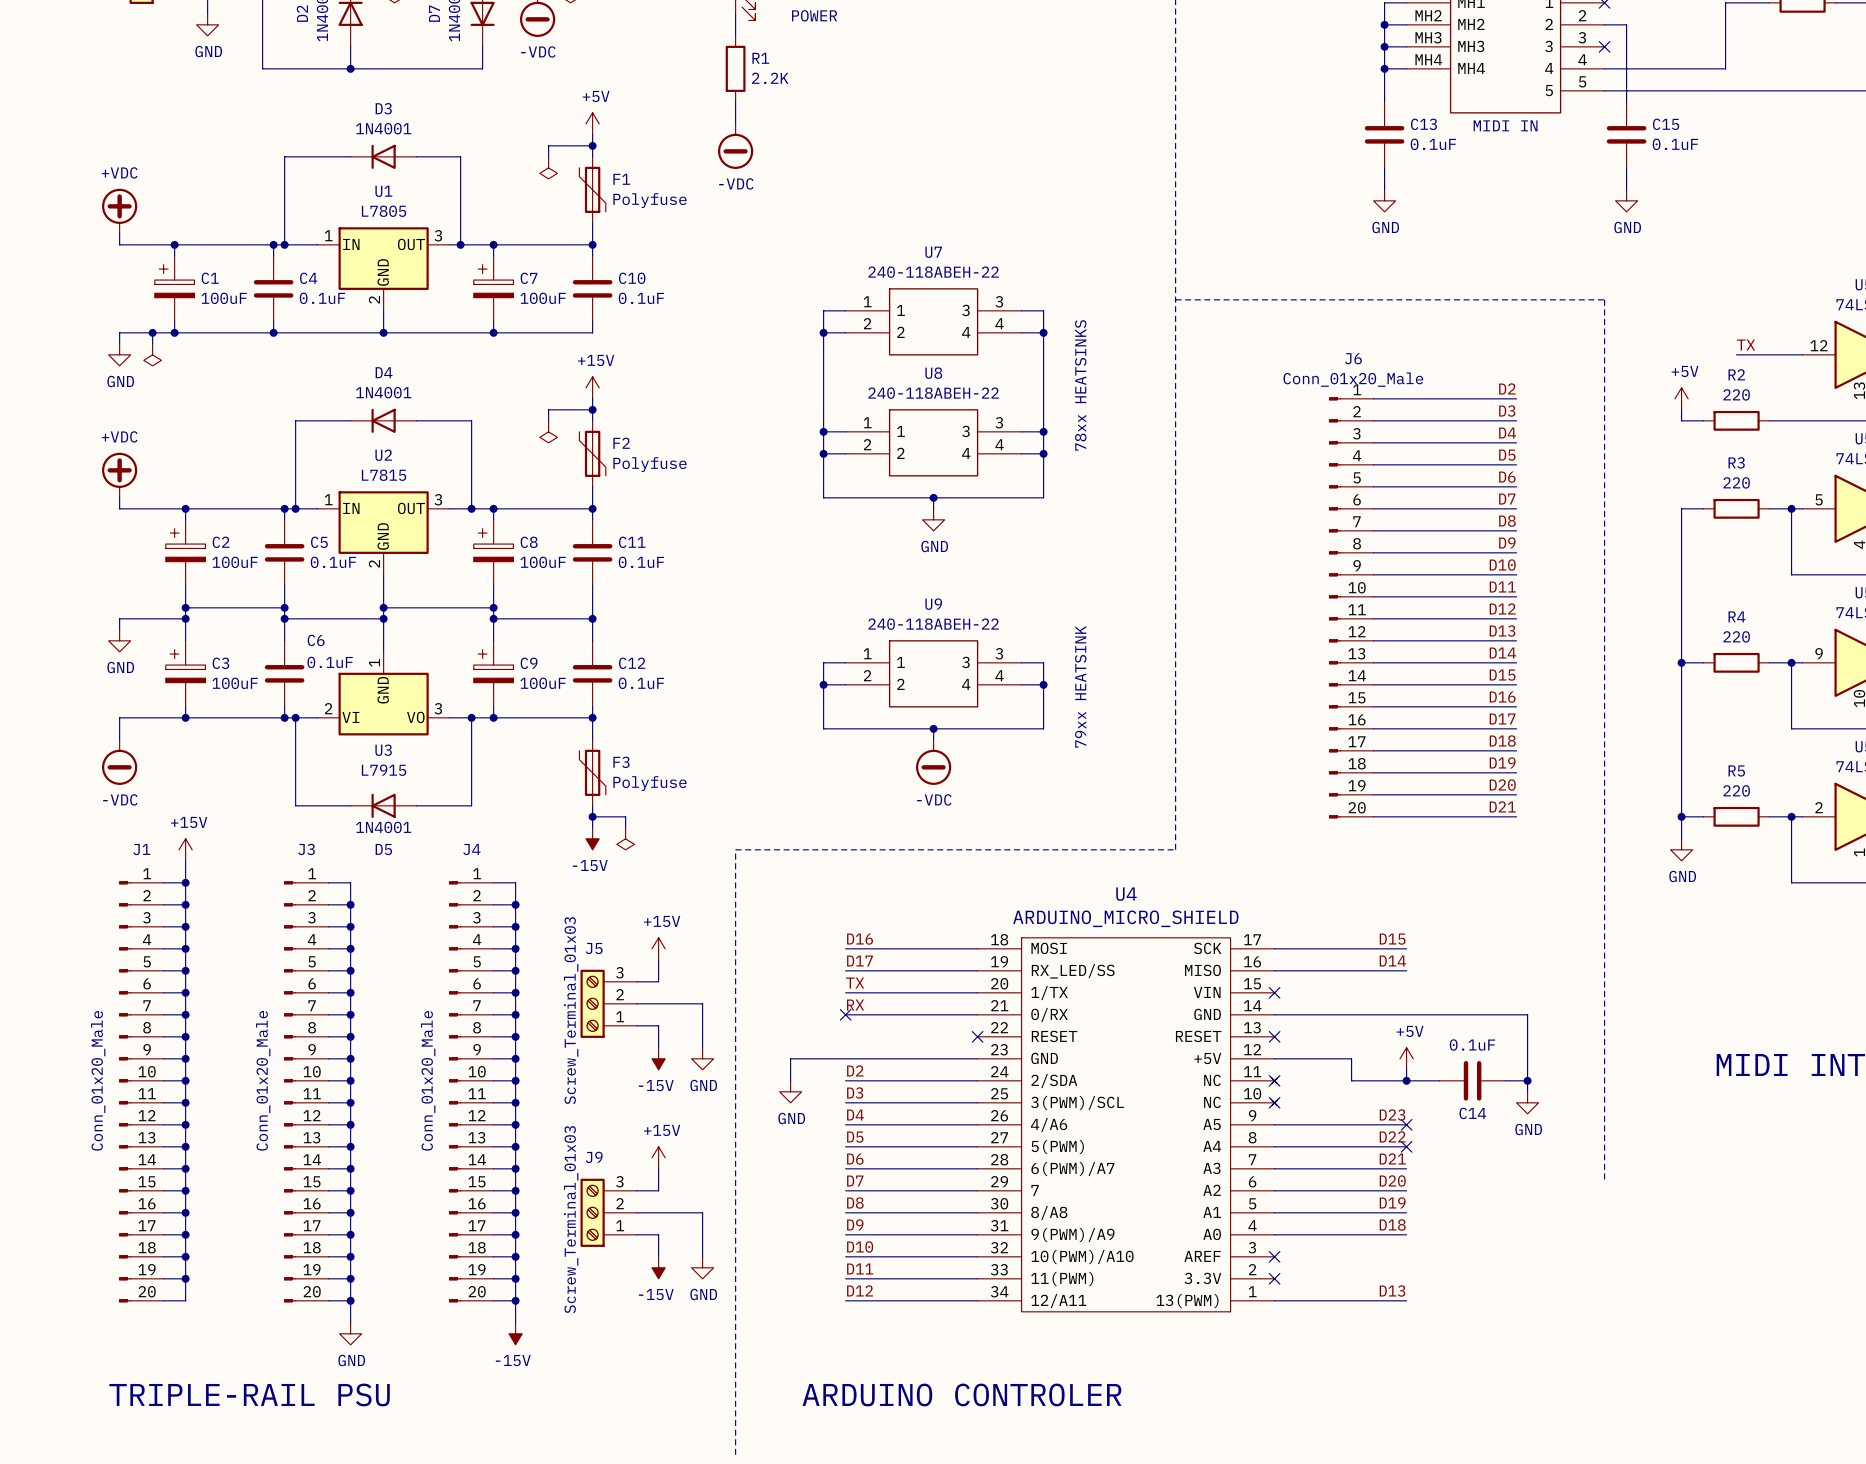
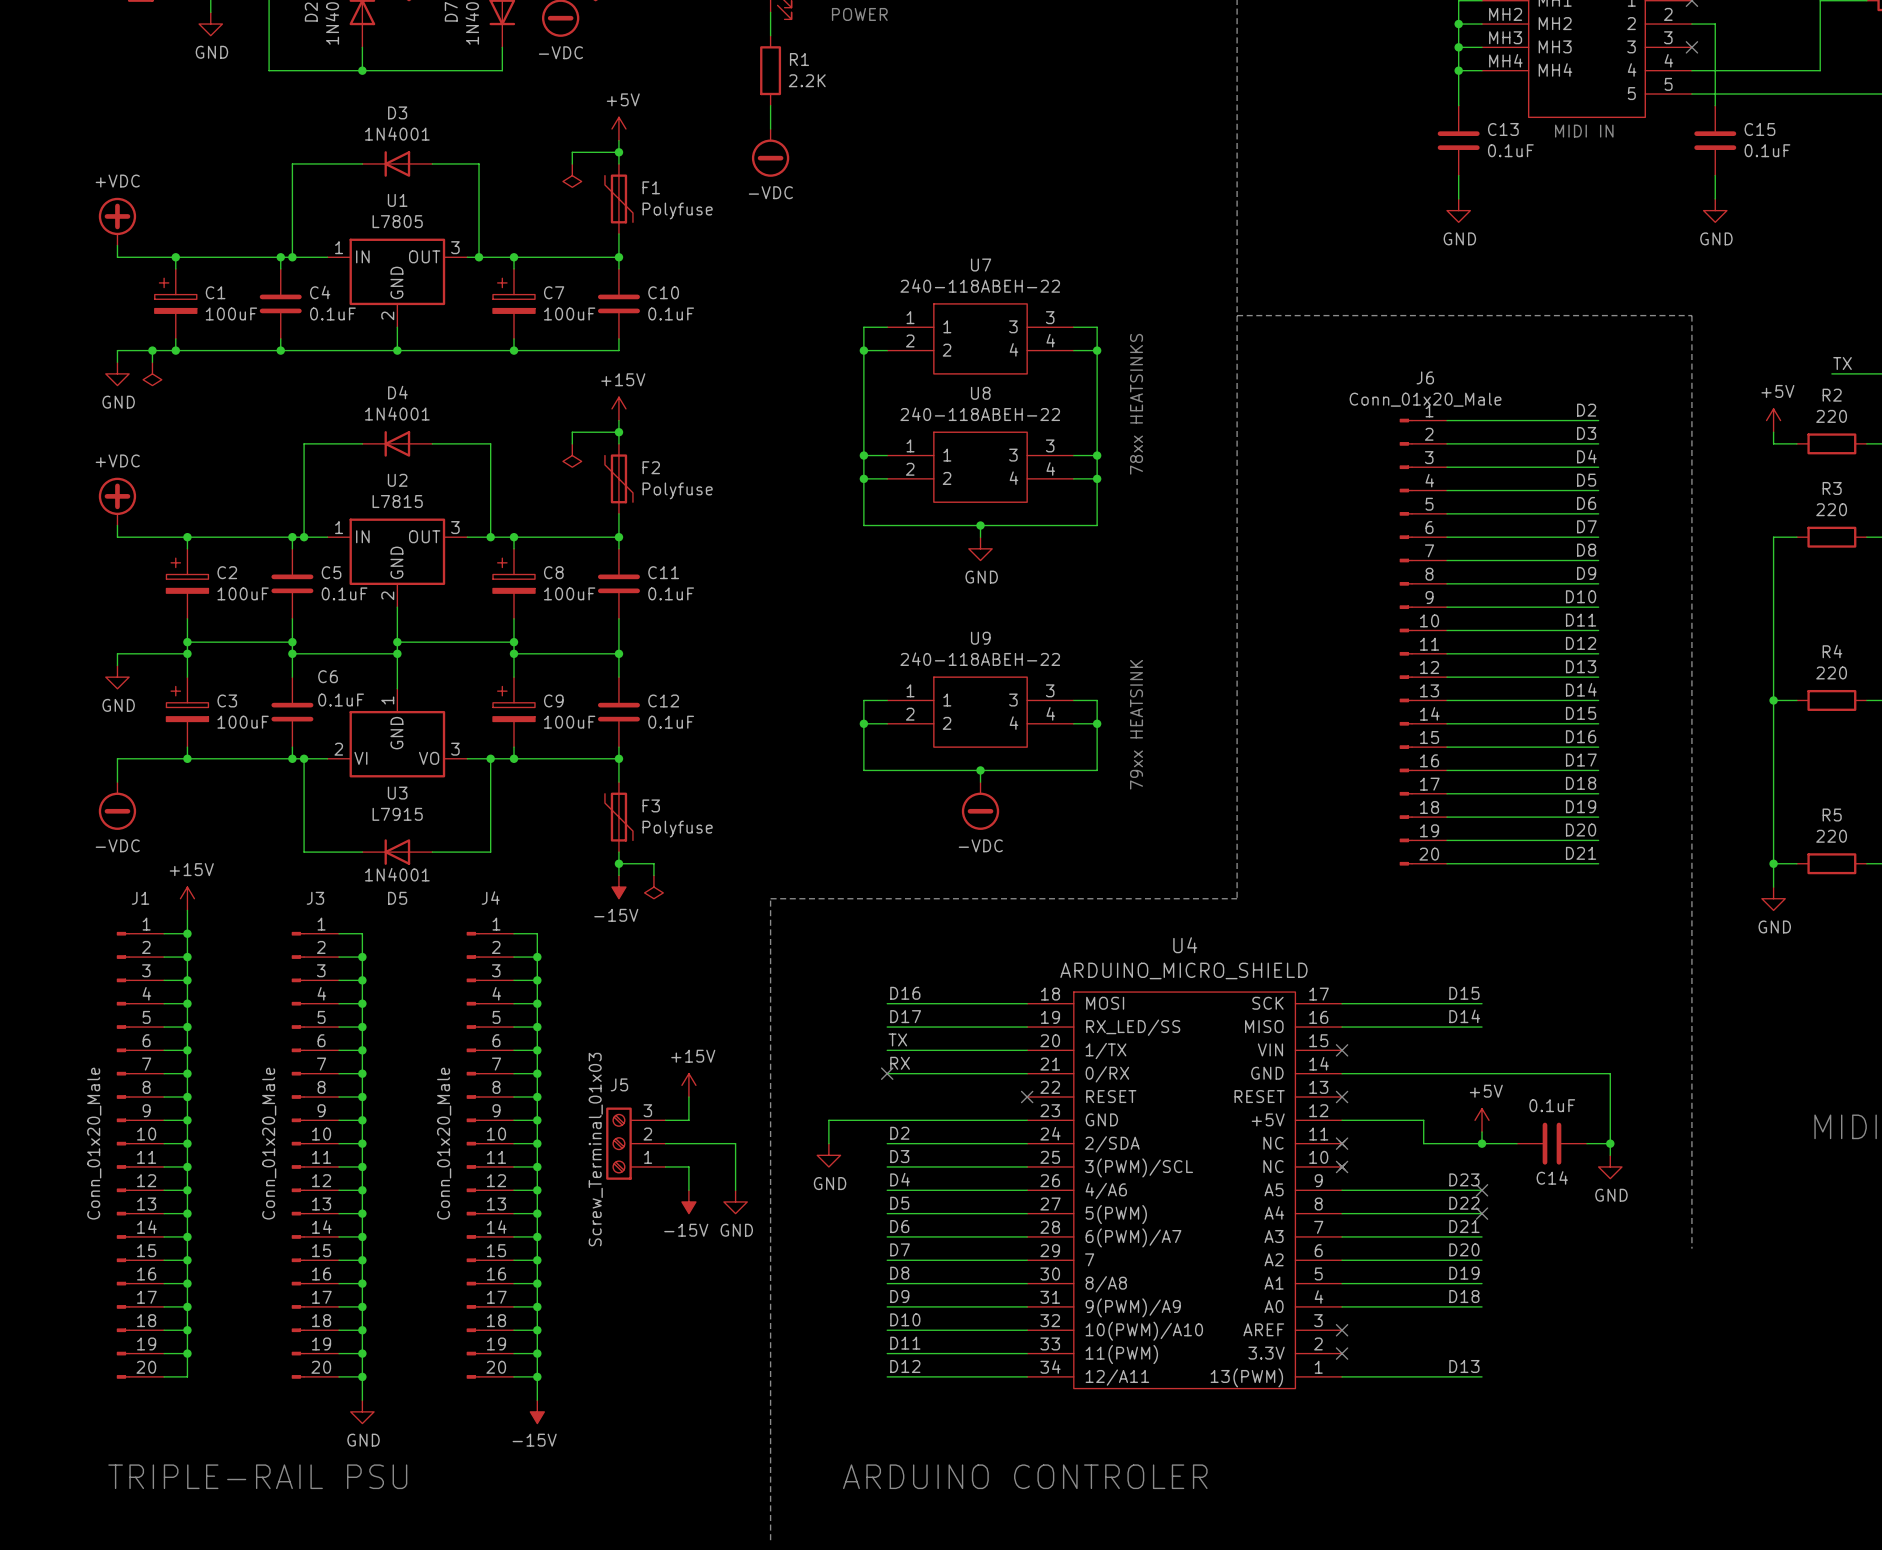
power symbol: +15V (658, 948) -> none
wire: (658, 959) (658, 981) (636, 981) -> none
J5 position: (608, 1003) -> (635, 1143)
wire: (636, 1003) (702, 1003) (702, 1047) -> none
wire: (636, 1025) (658, 1025) (658, 1036) -> none
power symbol: none -> +15V (688, 1085)
wire: none -> (688, 1108) (688, 1120) (665, 1120)
power symbol: -15V (658, 1058) -> none
power symbol: GND (702, 1058) -> none
power symbol: none -> -15V (688, 1201)
power symbol: none -> GND (735, 1201)
power symbol: +15V (658, 1157) -> none
wire: (658, 1168) (658, 1190) (636, 1190) -> none
J9: Screw_Terminal_01x03 (608, 1212) -> none
wire: (636, 1212) (702, 1212) (702, 1256) -> (665, 1143) (735, 1143) (735, 1190)
wire: (636, 1234) (658, 1234) (658, 1256) -> (665, 1166) (688, 1166) (688, 1190)
power symbol: -15V (658, 1267) -> none
power symbol: GND (702, 1267) -> none

